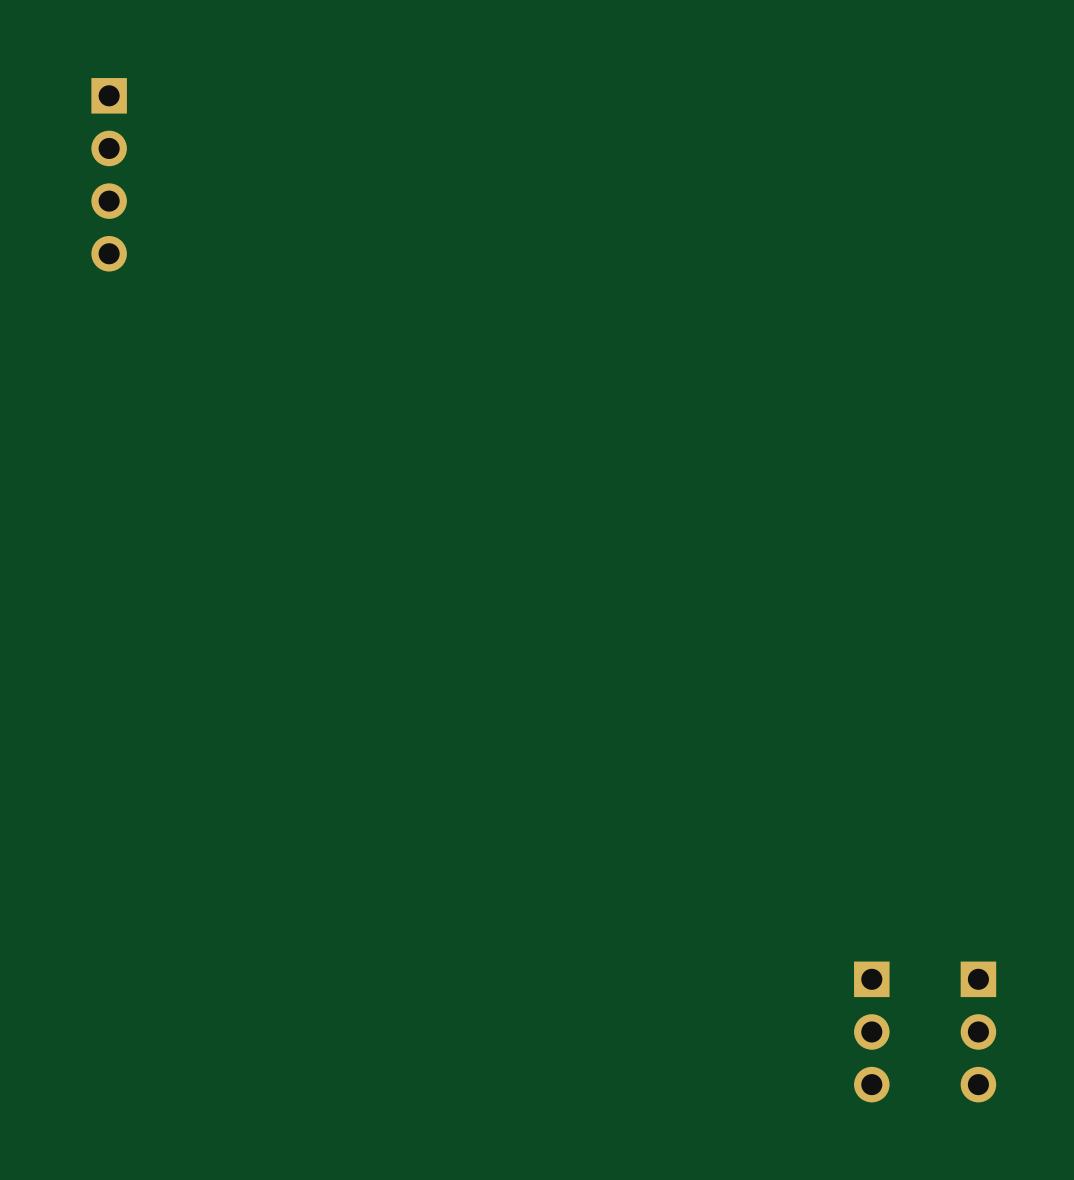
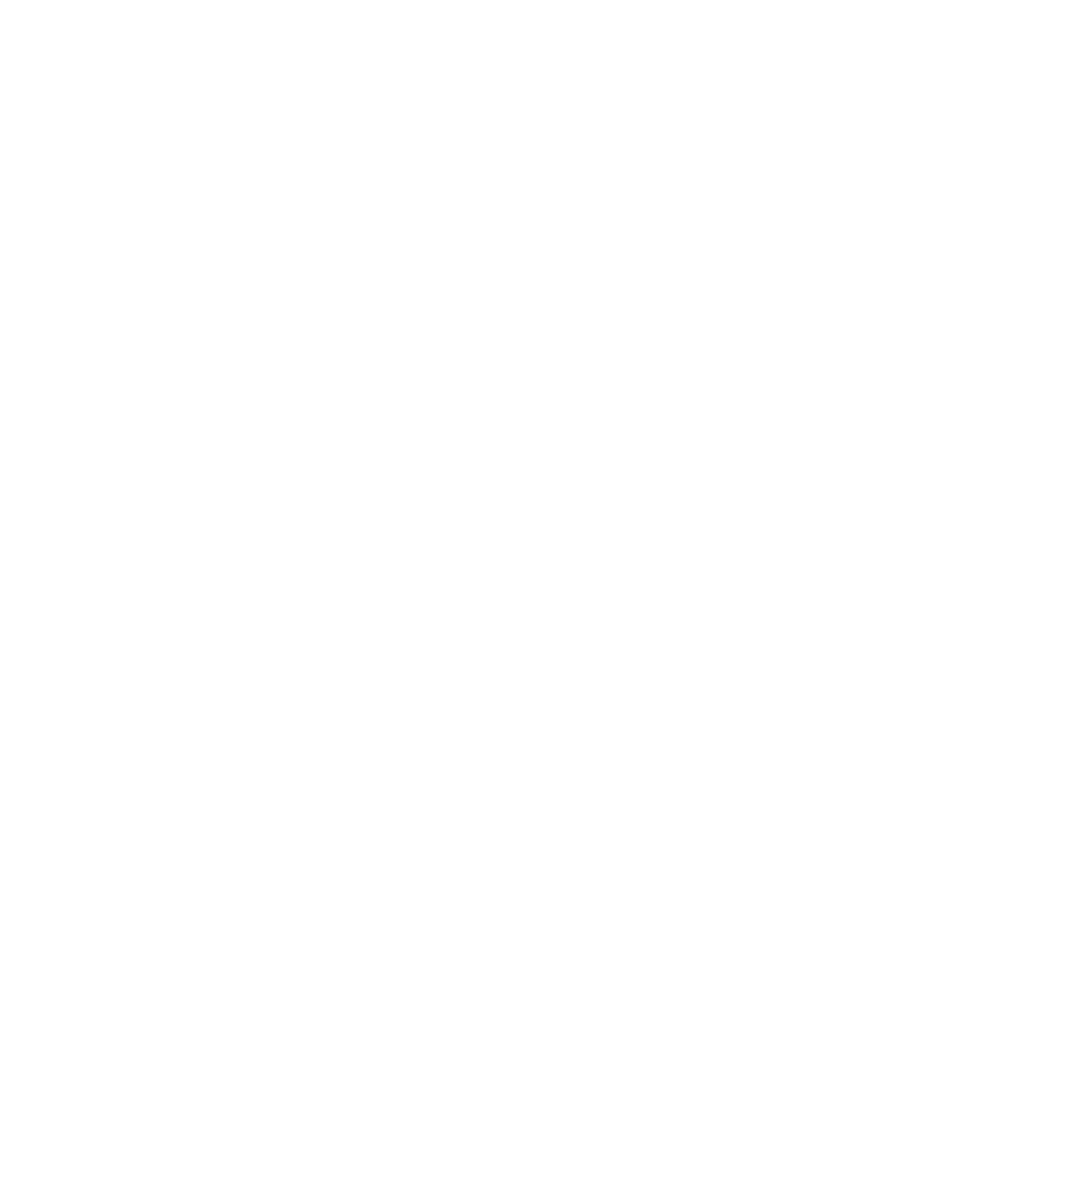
part: (109, 174) -> none
part: (871, 1031) -> none
part: (978, 1031) -> none

